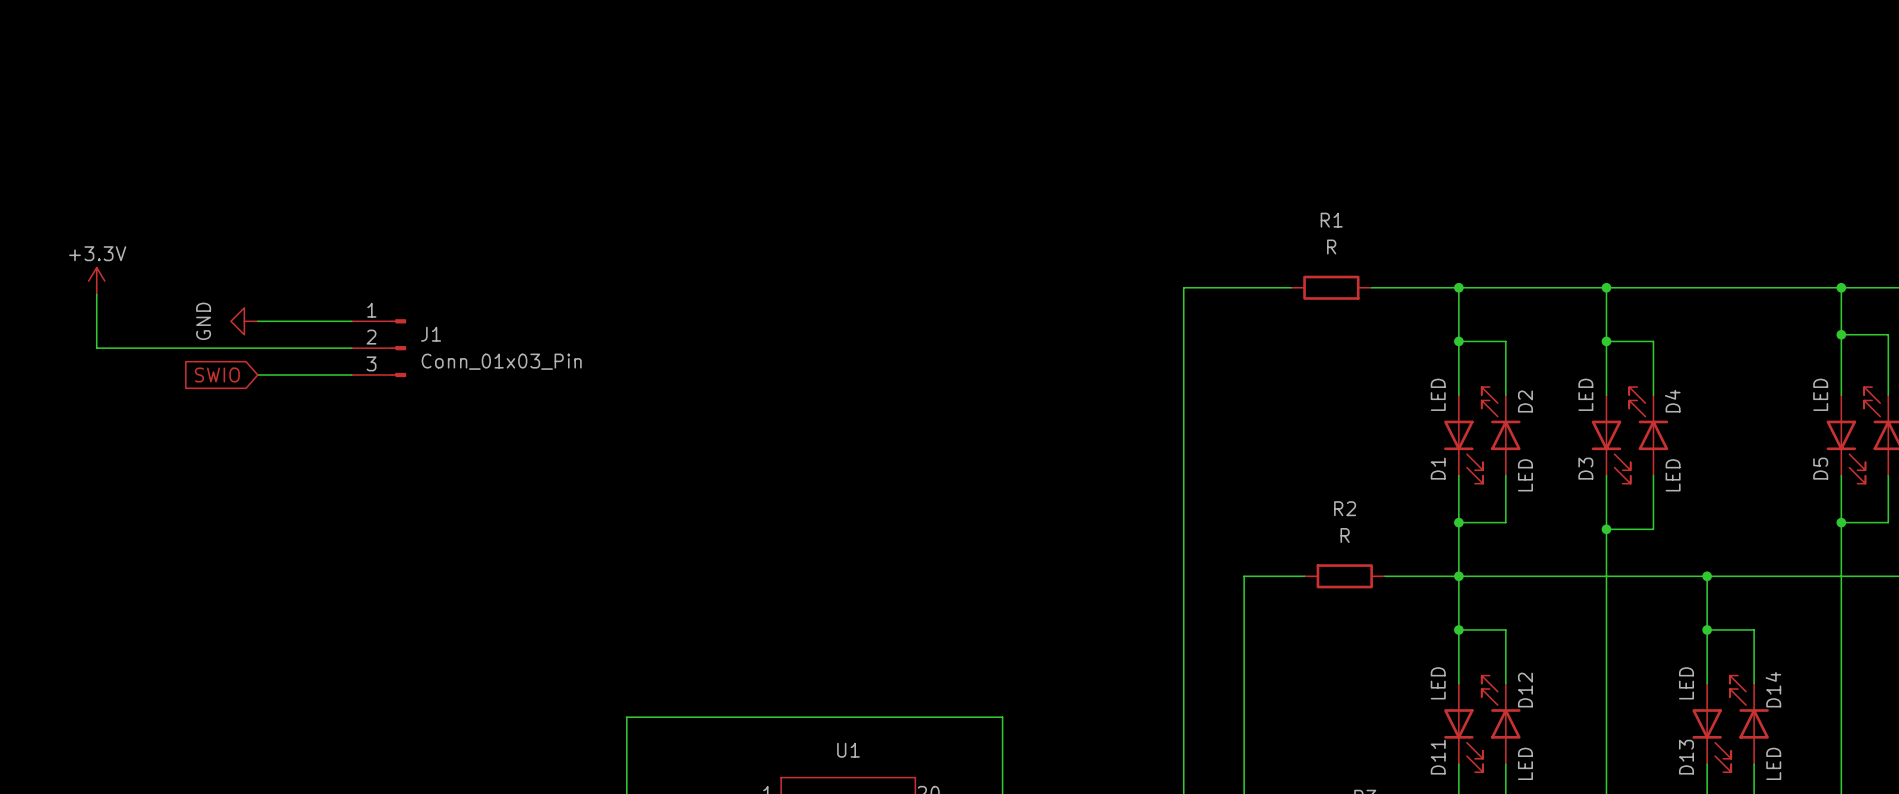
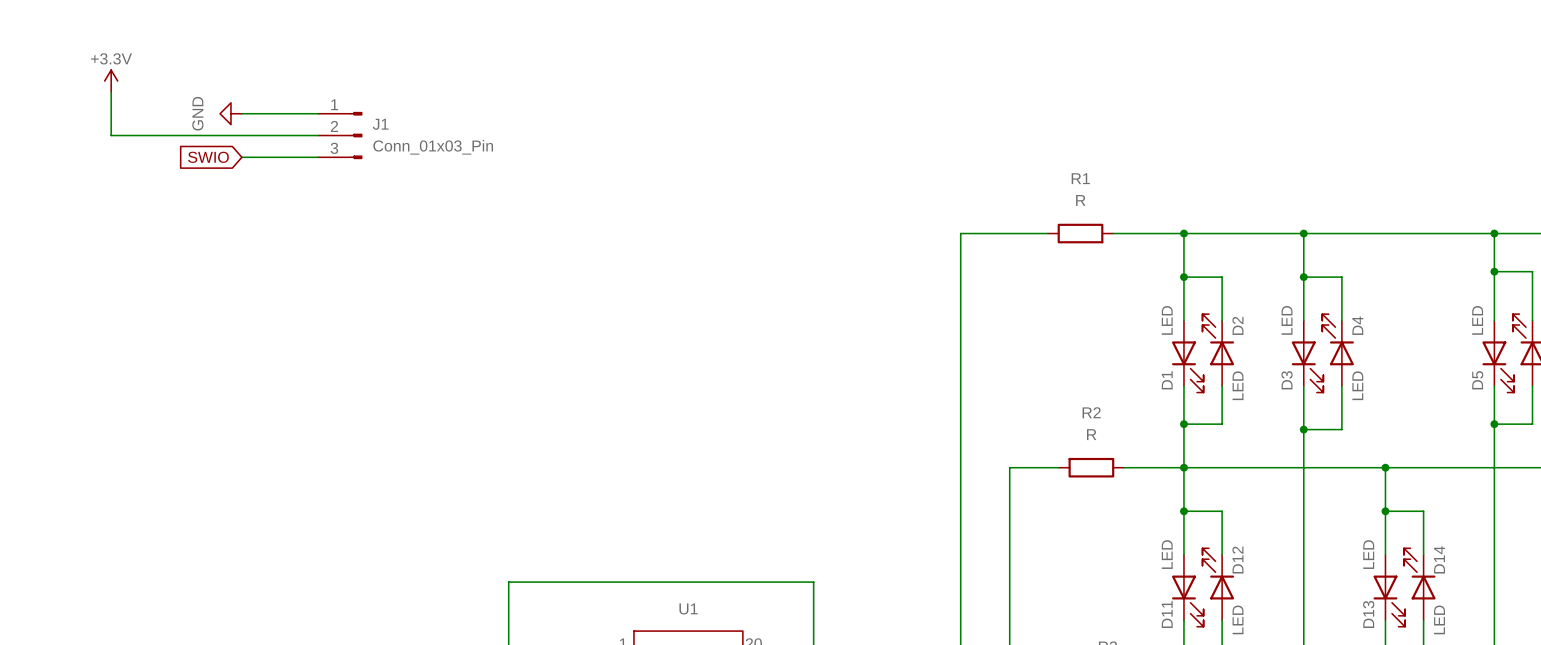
power symbol position: +3.3V (96, 281) -> +3.3V (111, 81)
wire: (96, 294) (96, 348) (351, 348) -> (111, 91) (111, 135) (318, 135)
power symbol position: GND (244, 321) -> GND (230, 113)
wire: (257, 321) (351, 321) -> (241, 157) (318, 157)
J1 position: (378, 348) -> (340, 135)
global label position: SWIO (217, 374) -> SWIO (208, 157)
wire: (257, 374) (351, 374) -> (241, 113) (318, 113)

